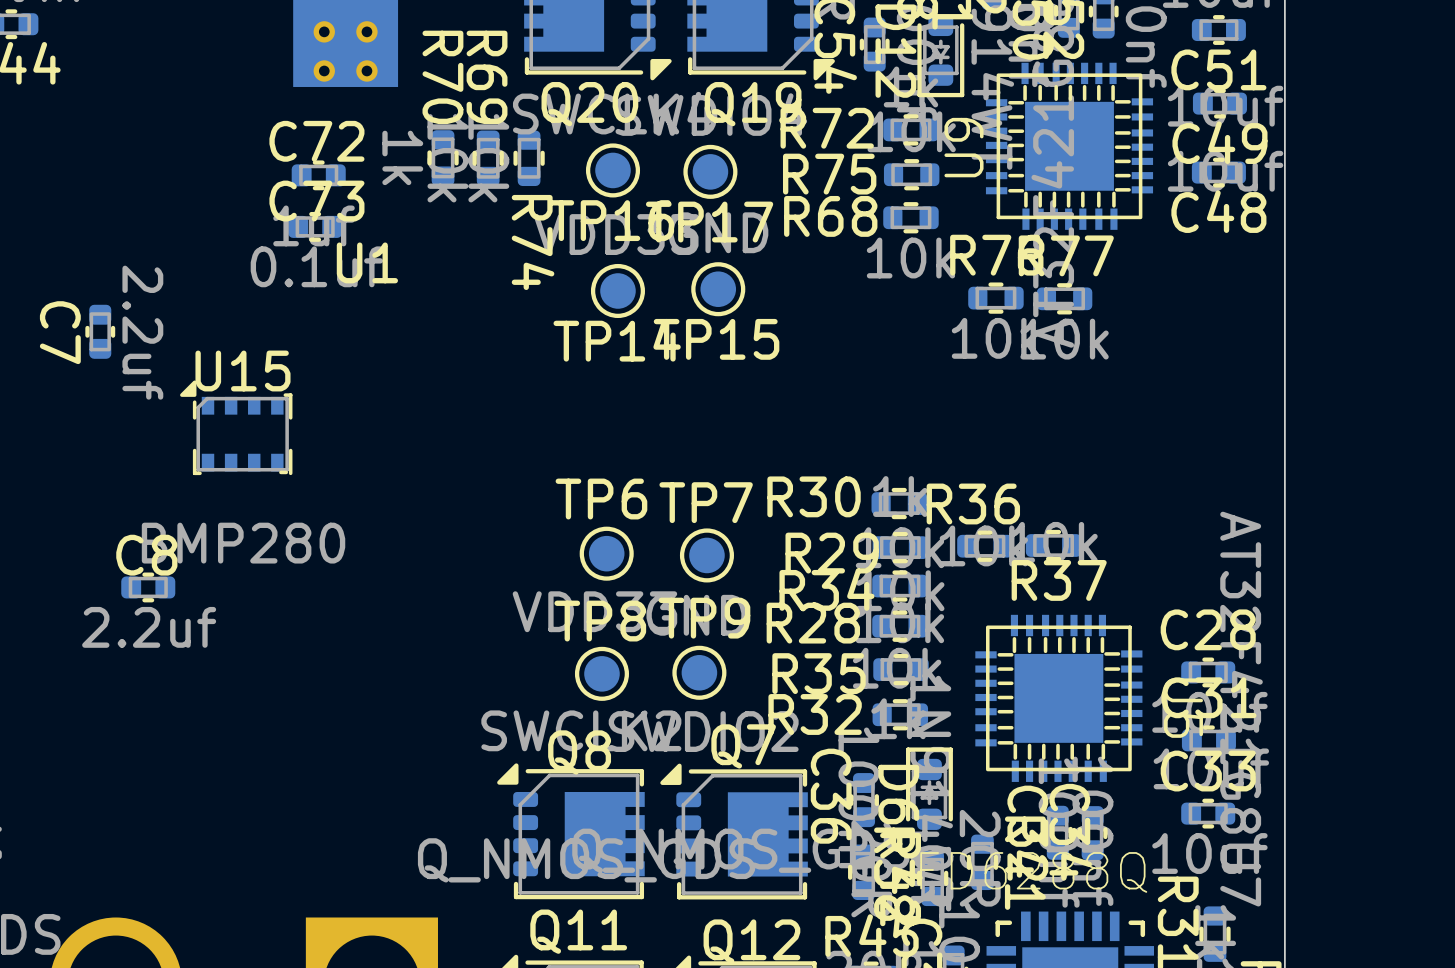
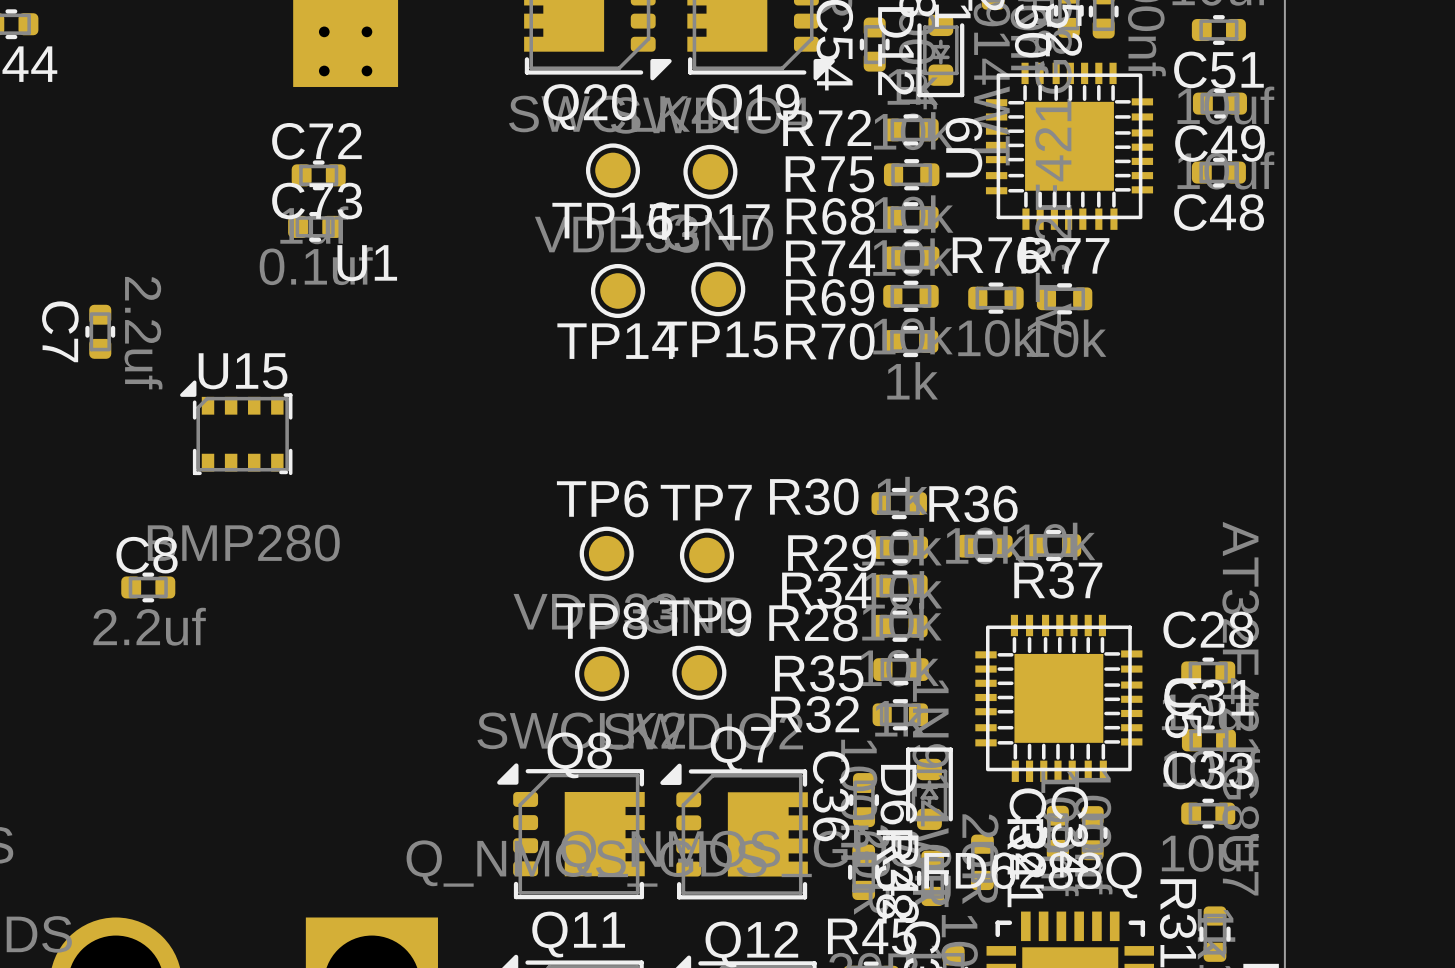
R70 name position: R70 (442, 77) -> R70 (830, 341)
R69 name position: R69 (487, 77) -> R69 (830, 297)
R70 rotation: 0° (443, 157) -> 90° clockwise (910, 341)
R70 position: (443, 157) -> (910, 341)
R69 rotation: 0° (488, 158) -> 90° clockwise (910, 296)
R69 position: (488, 158) -> (910, 296)
R74 rotation: 0° (529, 158) -> 90° clockwise (911, 257)
R74 position: (529, 158) -> (911, 257)

